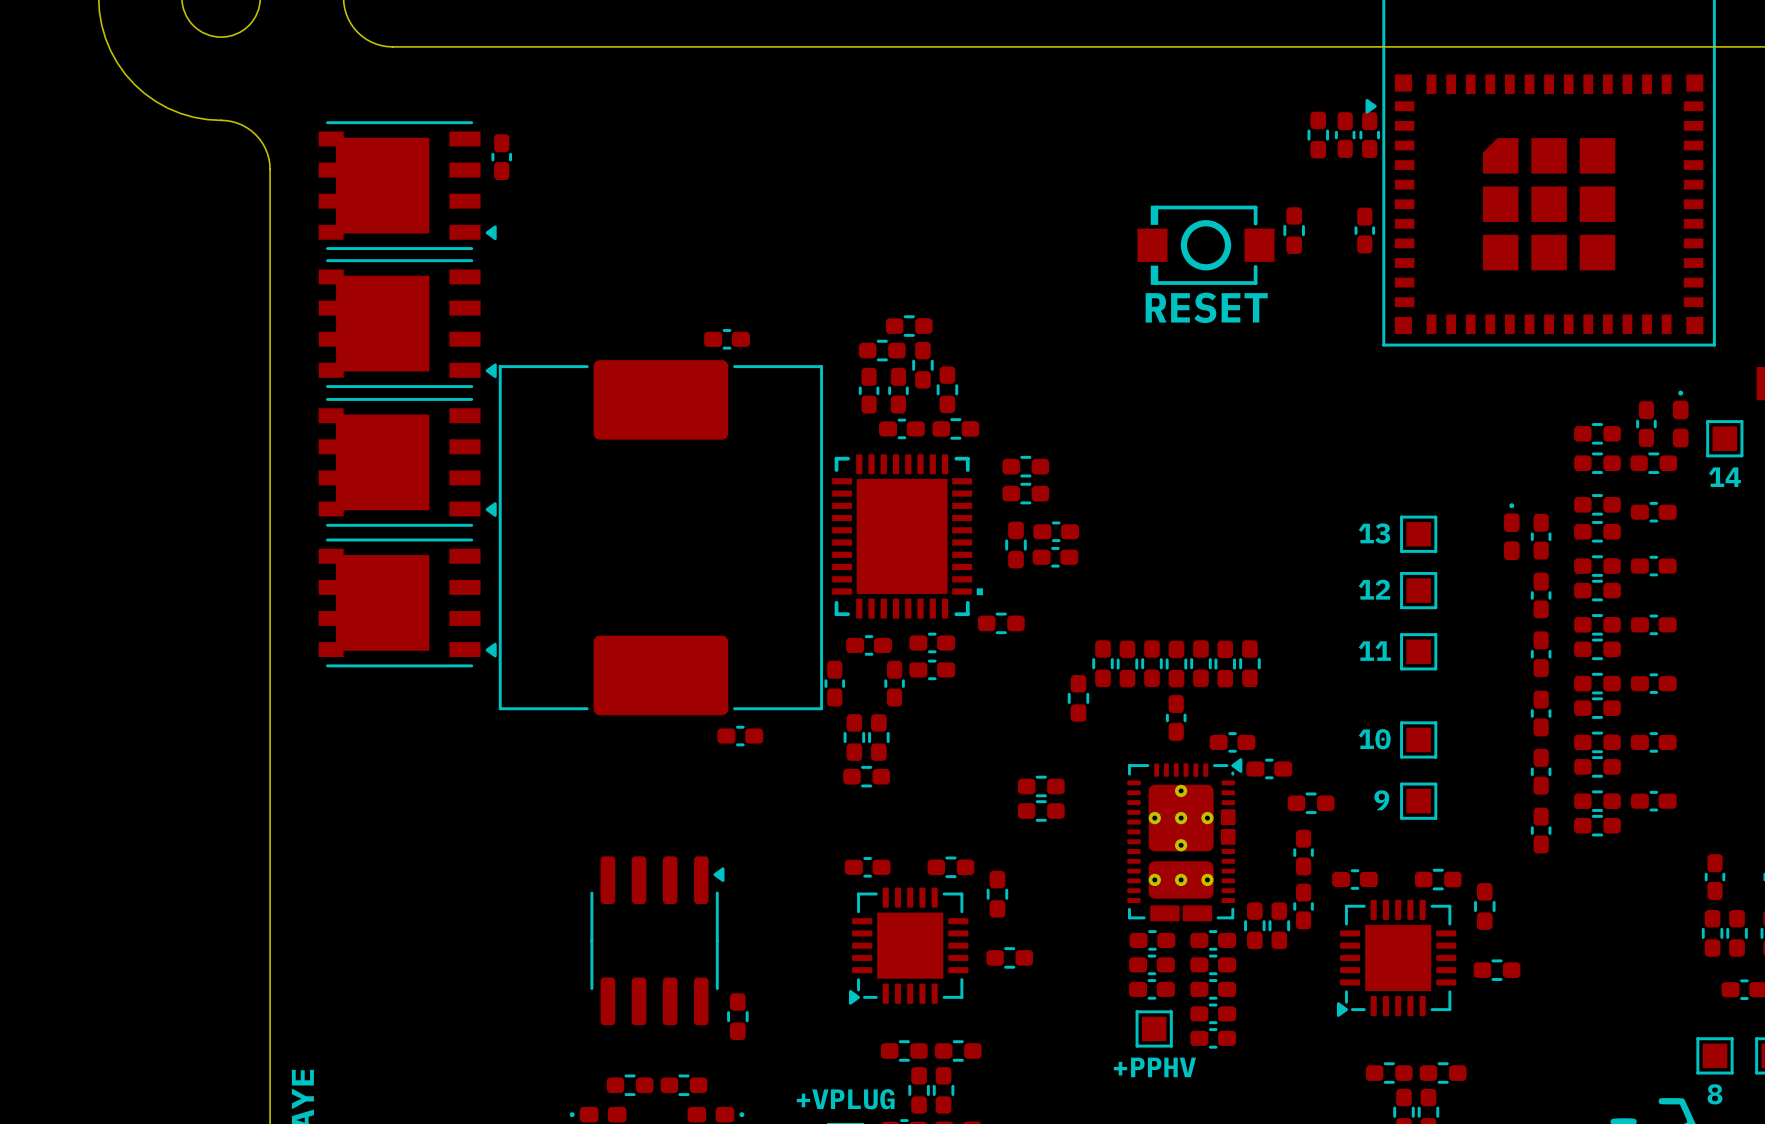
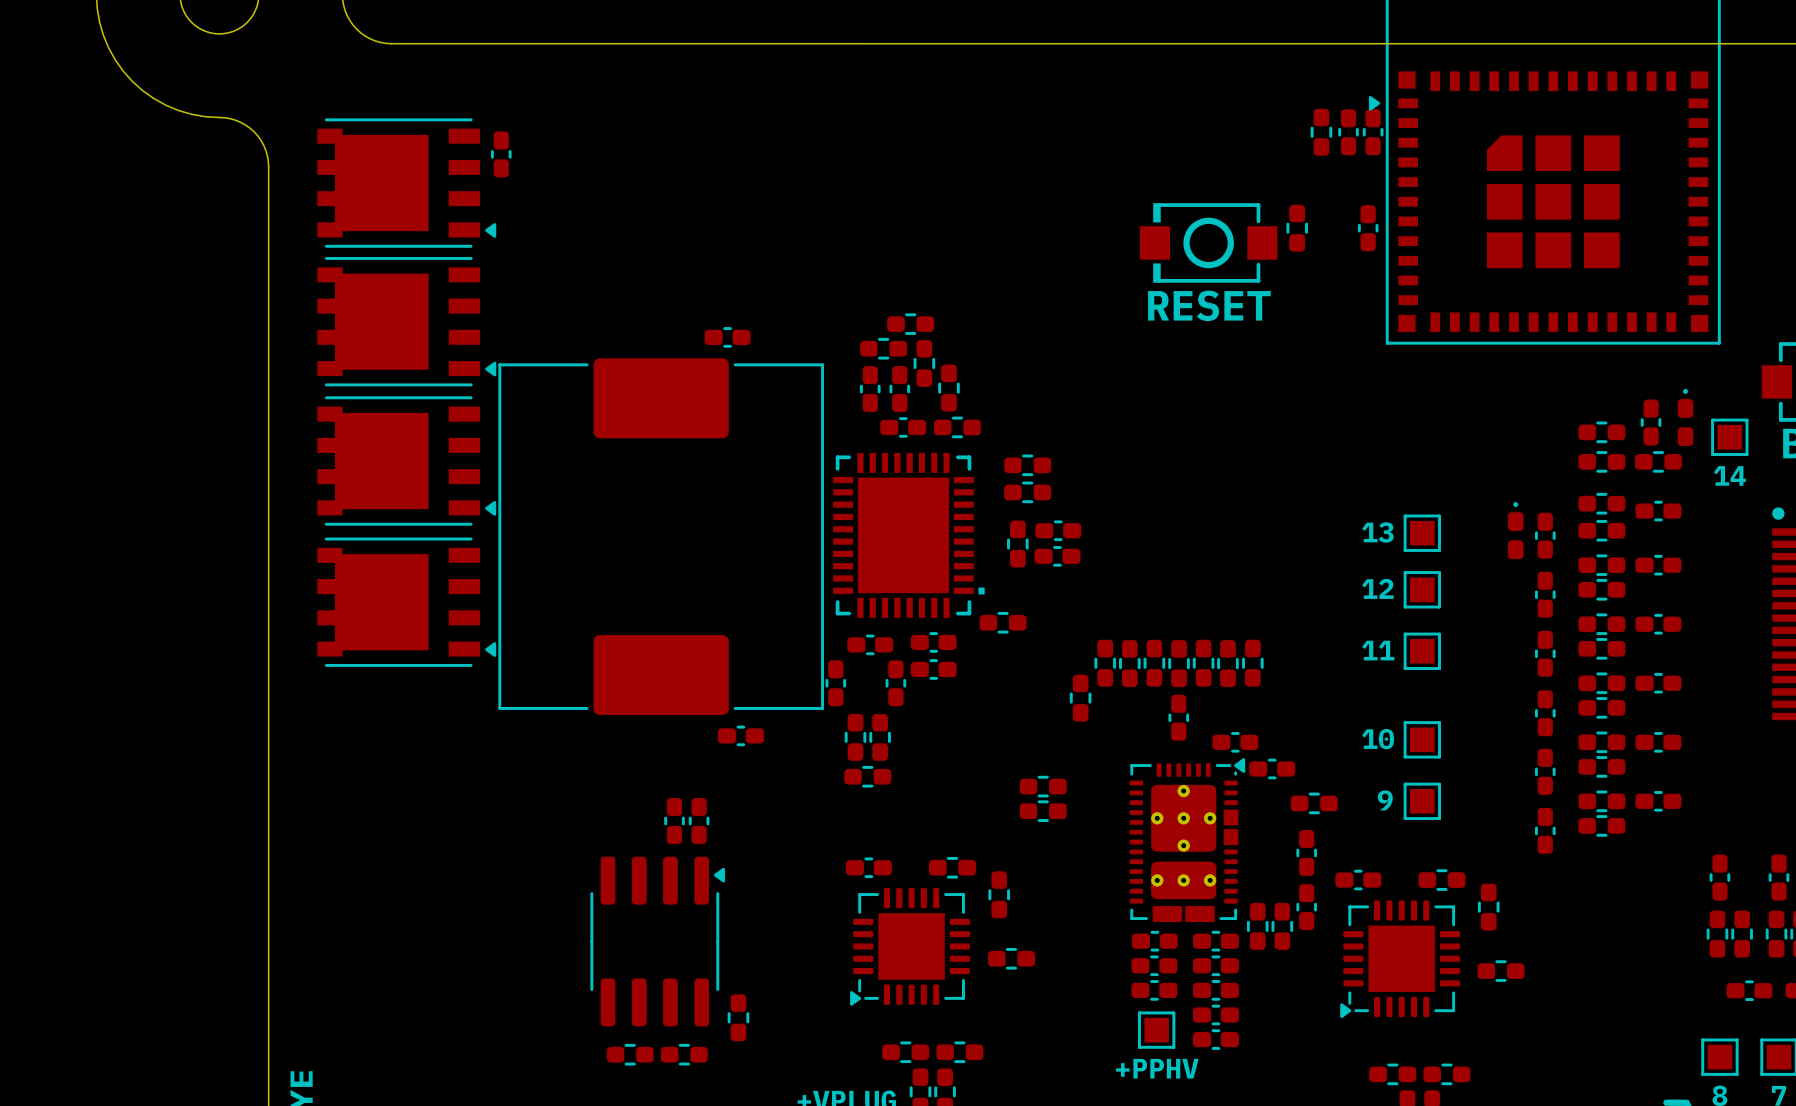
part: none -> (674, 821)
part: none -> (699, 821)
part: none -> (630, 1054)
part: none -> (684, 1054)
part: (630, 1085) -> none
part: (683, 1085) -> none

